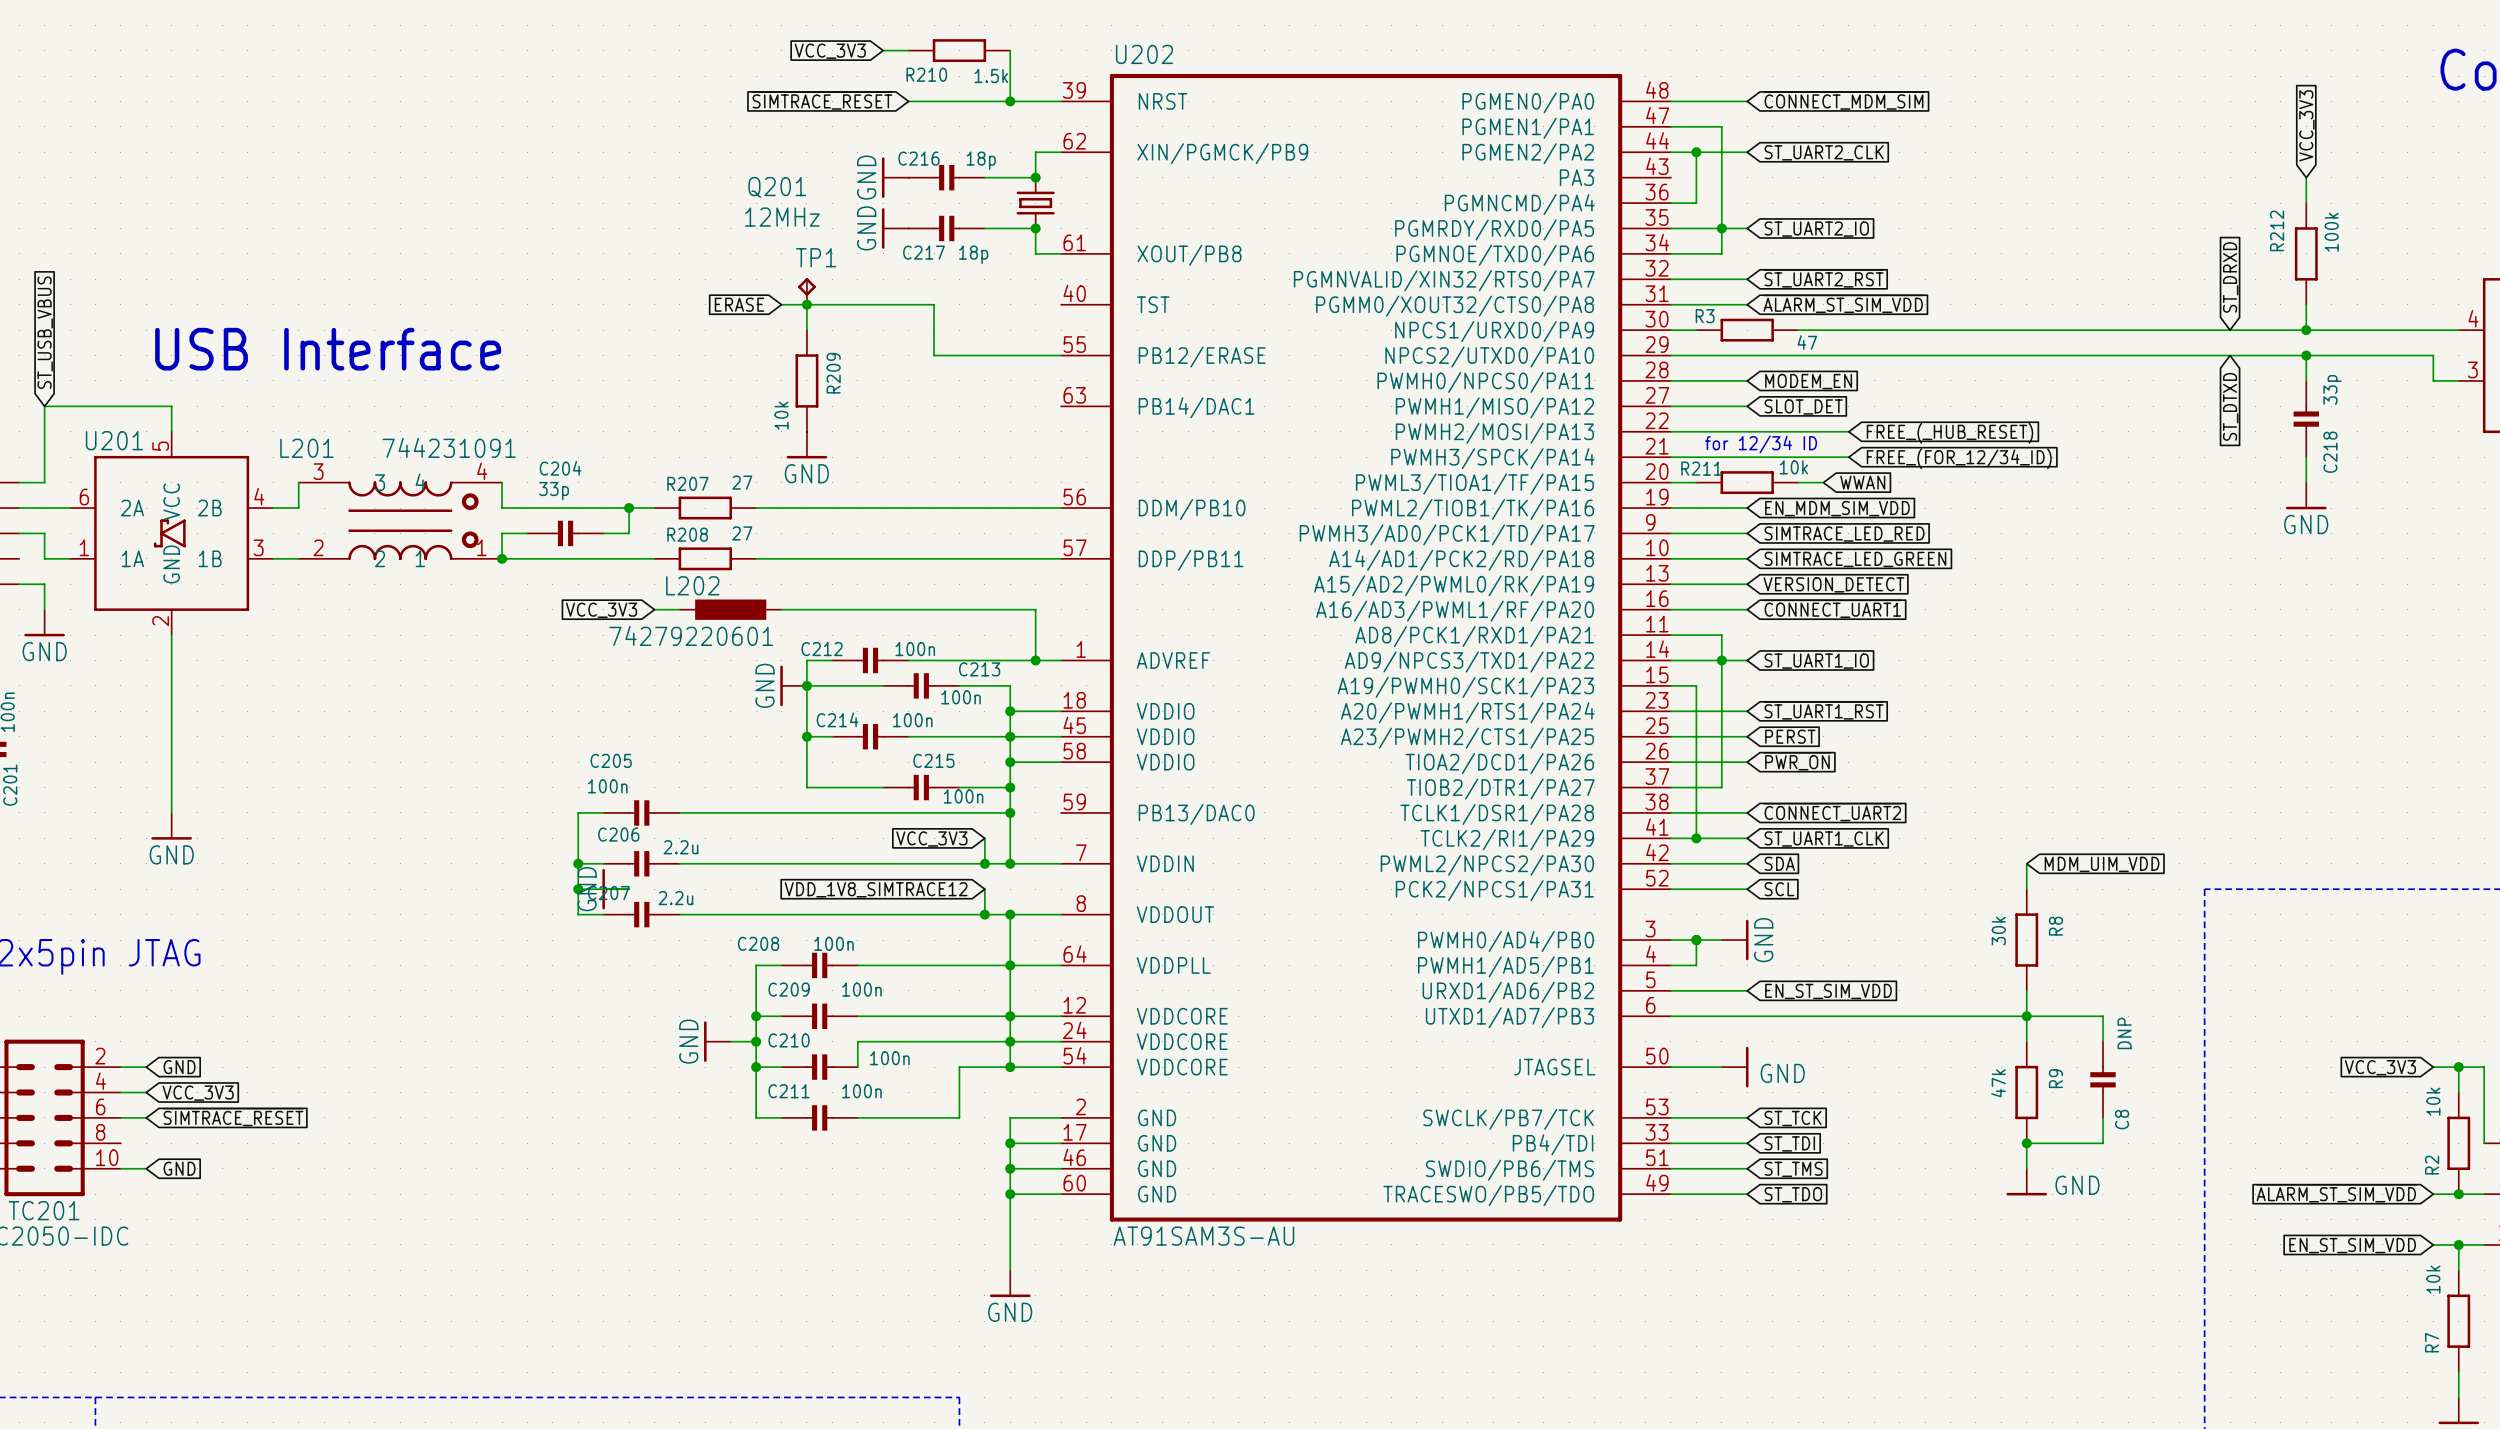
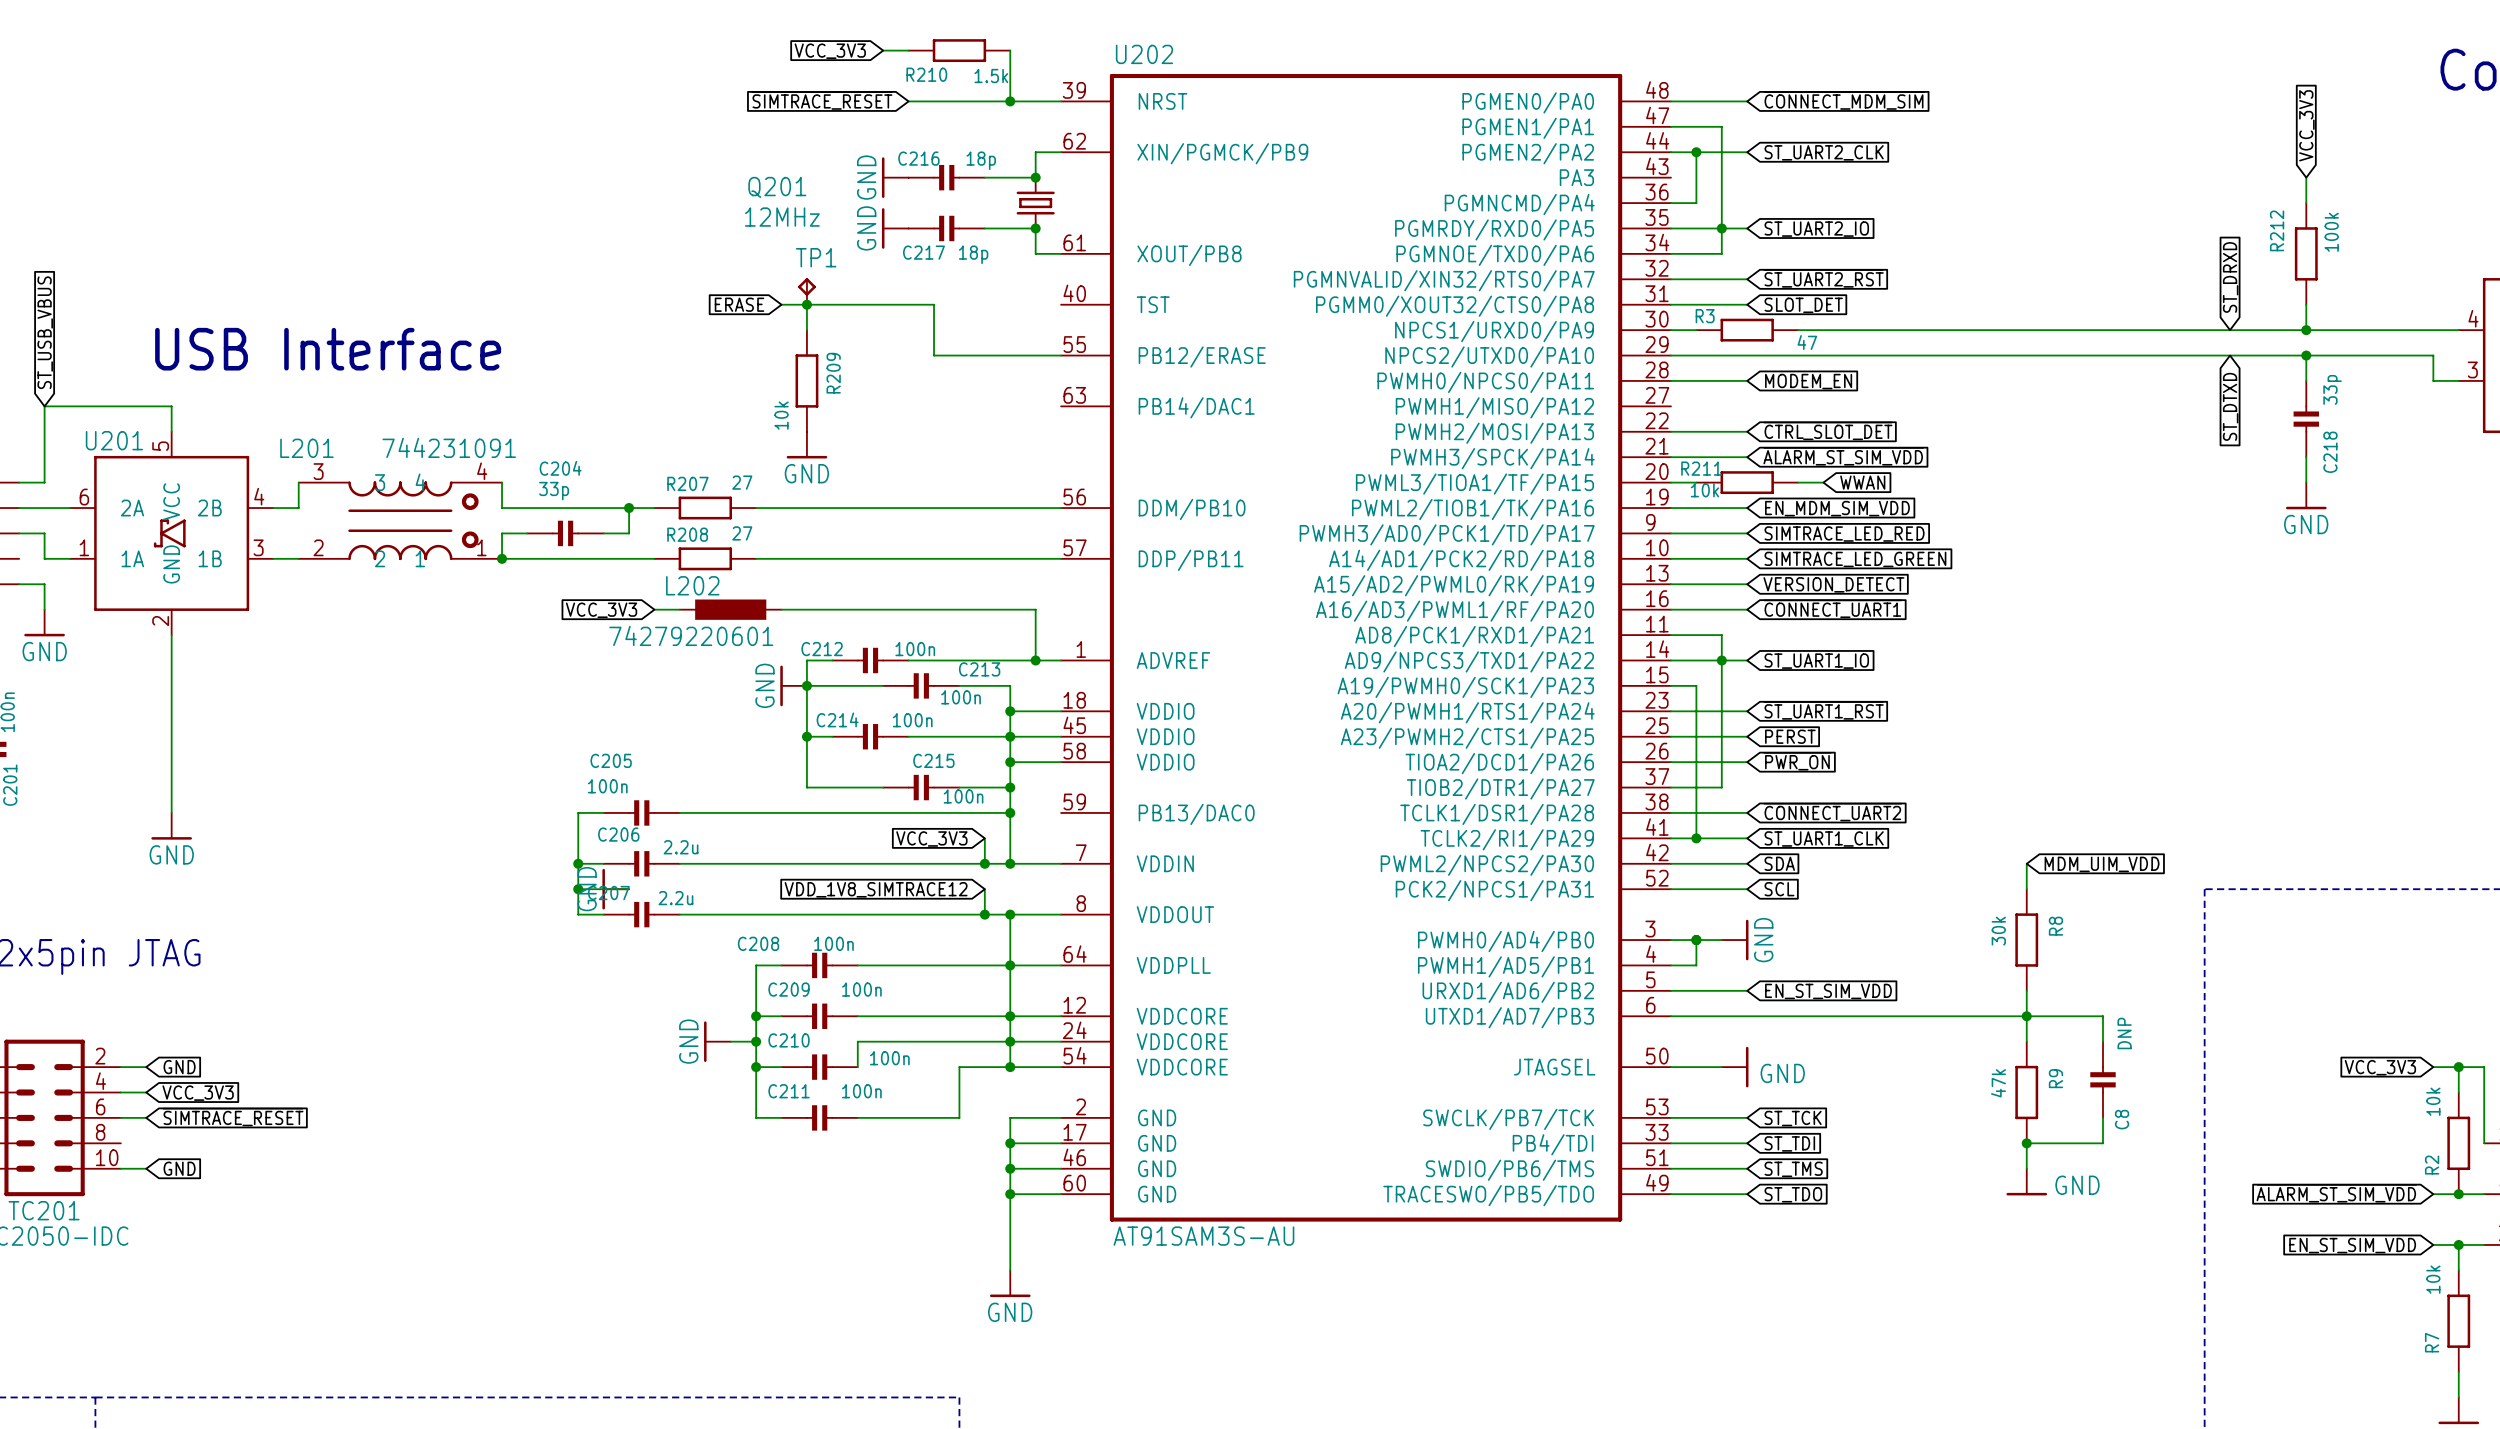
global label: ~{ALARM_ST_SIM_VDD} (1843, 303) -> SLOT_DET (1803, 305)
wire: (1670, 406) (1747, 406) -> none
global label: SLOT_DET (1803, 406) -> ~{CTRL_SLOT_DET} (1827, 430)
wire: (1747, 431) (1848, 431) -> none
global label: FREE_(_HUB_RESET) (1950, 433) -> none
text: for 12/34 ID (1761, 444) -> none
global label: none -> ~{ALARM_ST_SIM_VDD} (1843, 456)
wire: (1747, 457) (1848, 457) -> none
global label: FREE_(FOR_12/34_ID) (1959, 458) -> none
R211 value position: 10k (1793, 467) -> 10k (1704, 490)

